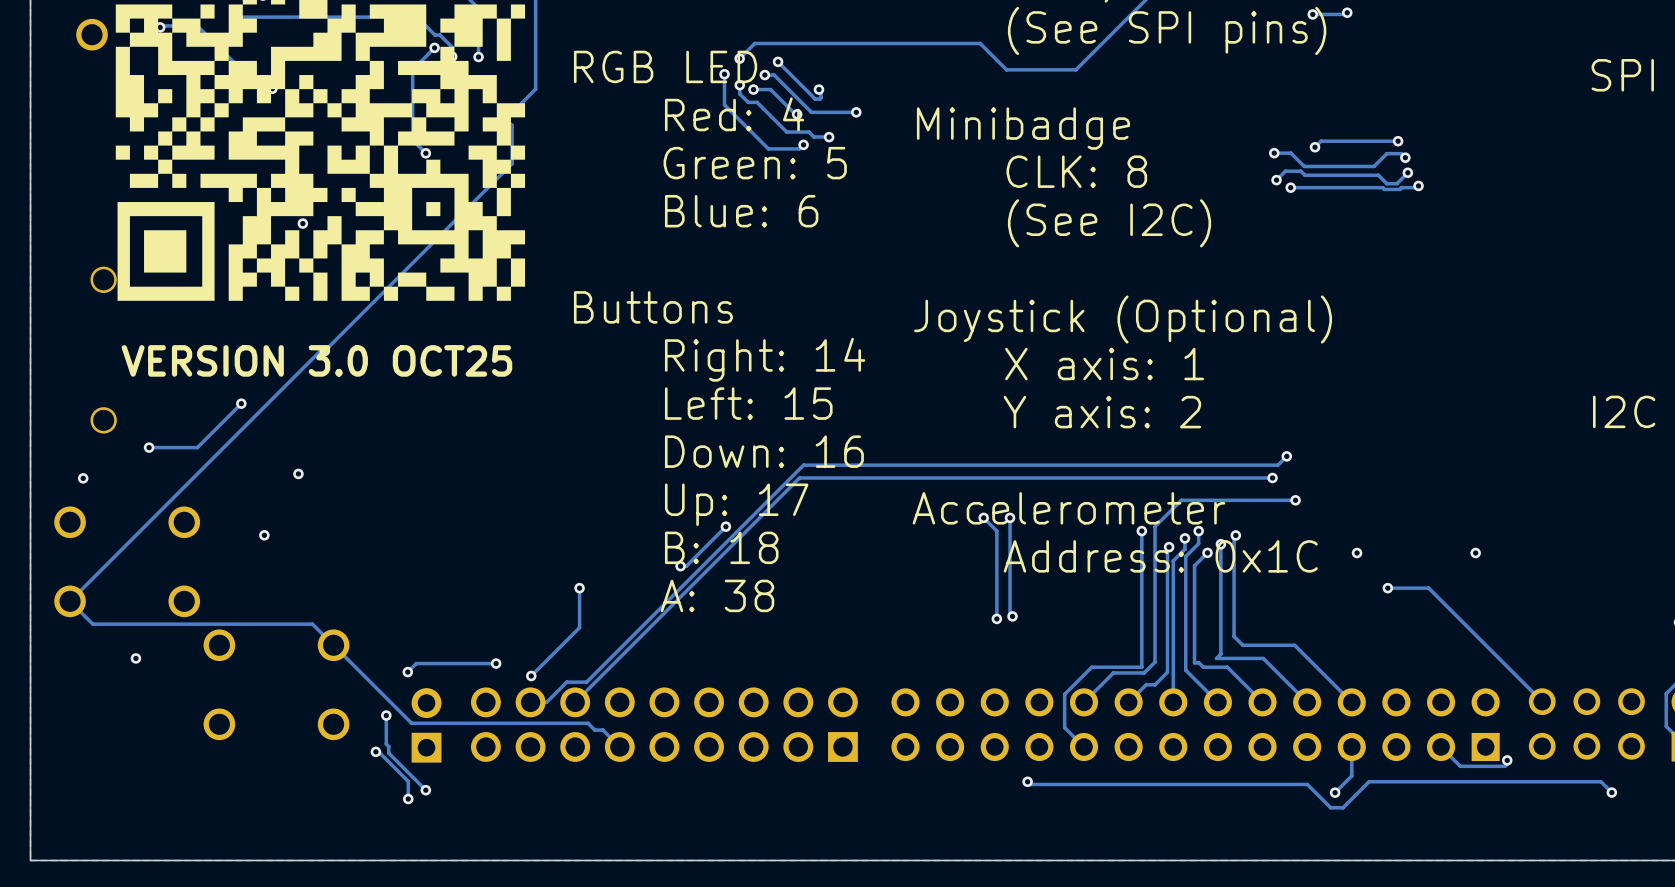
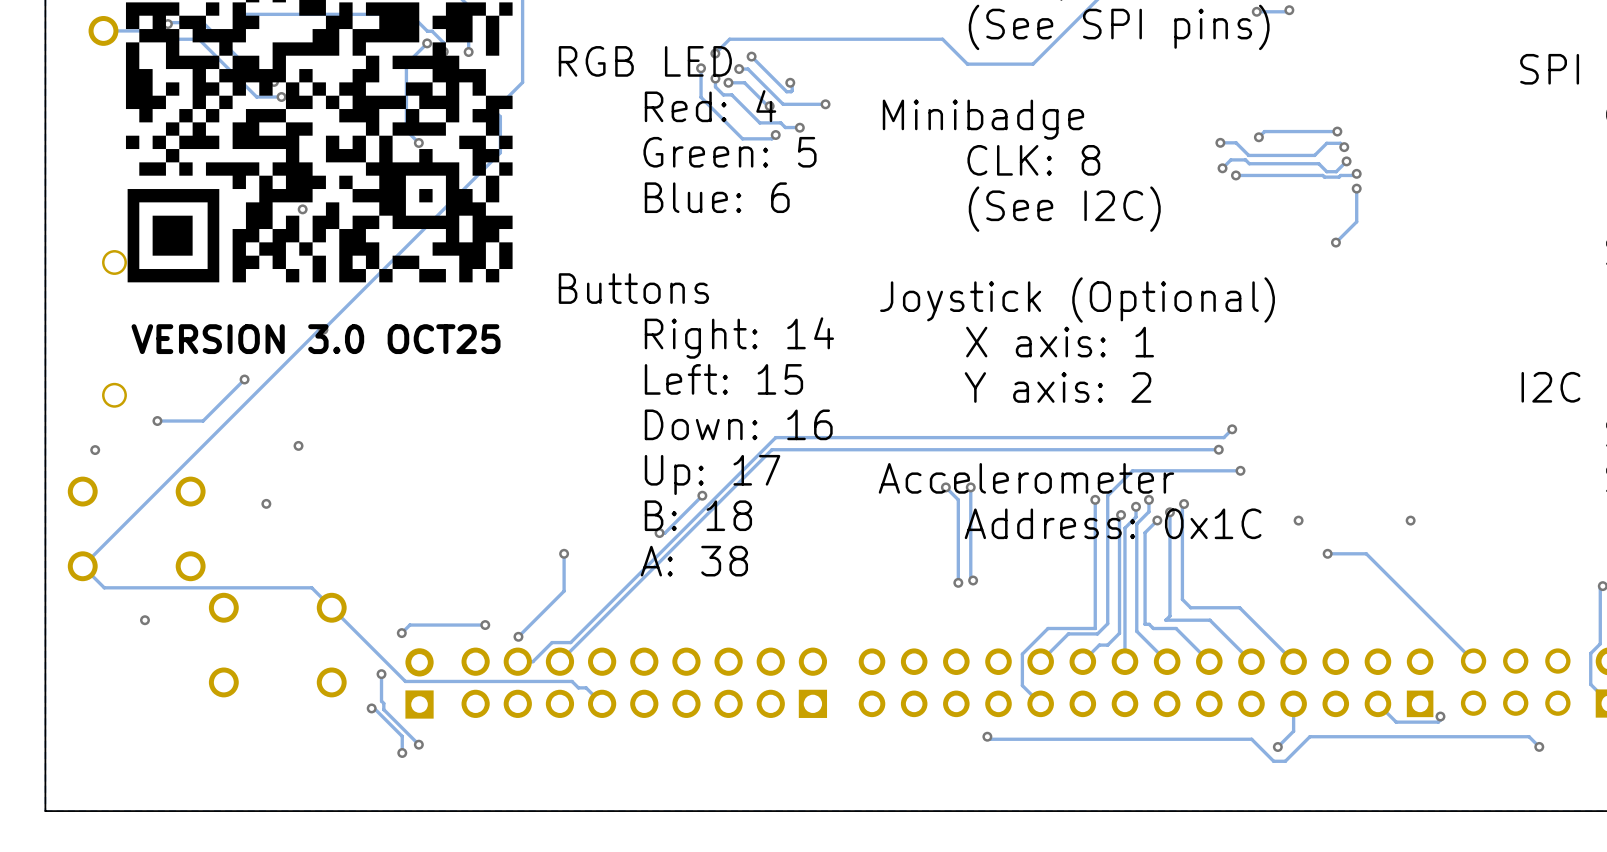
track: none -> (95, 30) (144, 30) (153, 39) (198, 39) (256, 97) (281, 97)
via: none -> (281, 97)
track: none -> (1356, 188) (1356, 221) (1335, 242)
via: none -> (1356, 188)
via: none -> (1335, 242)

